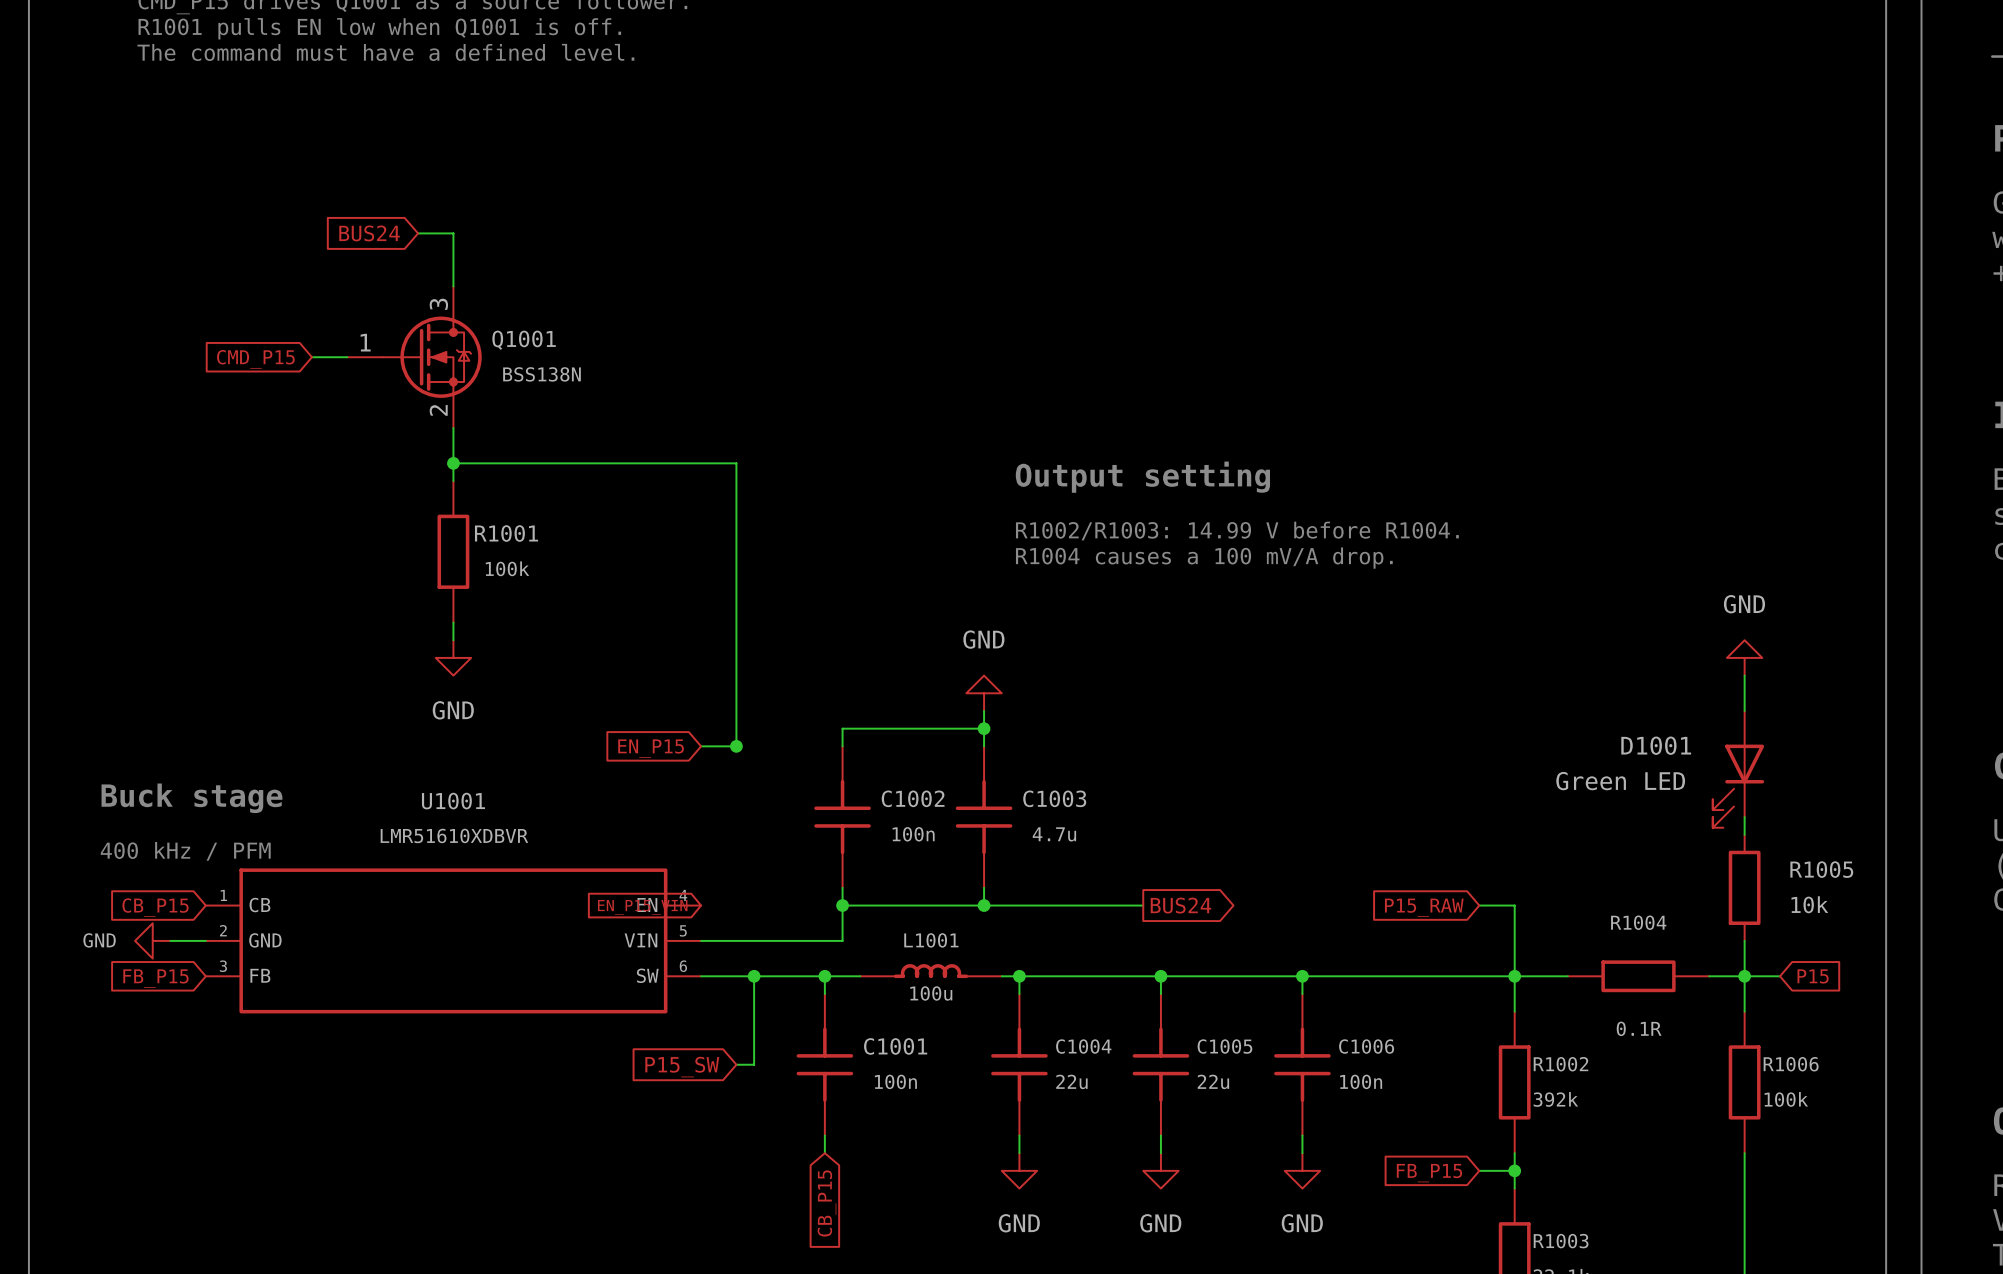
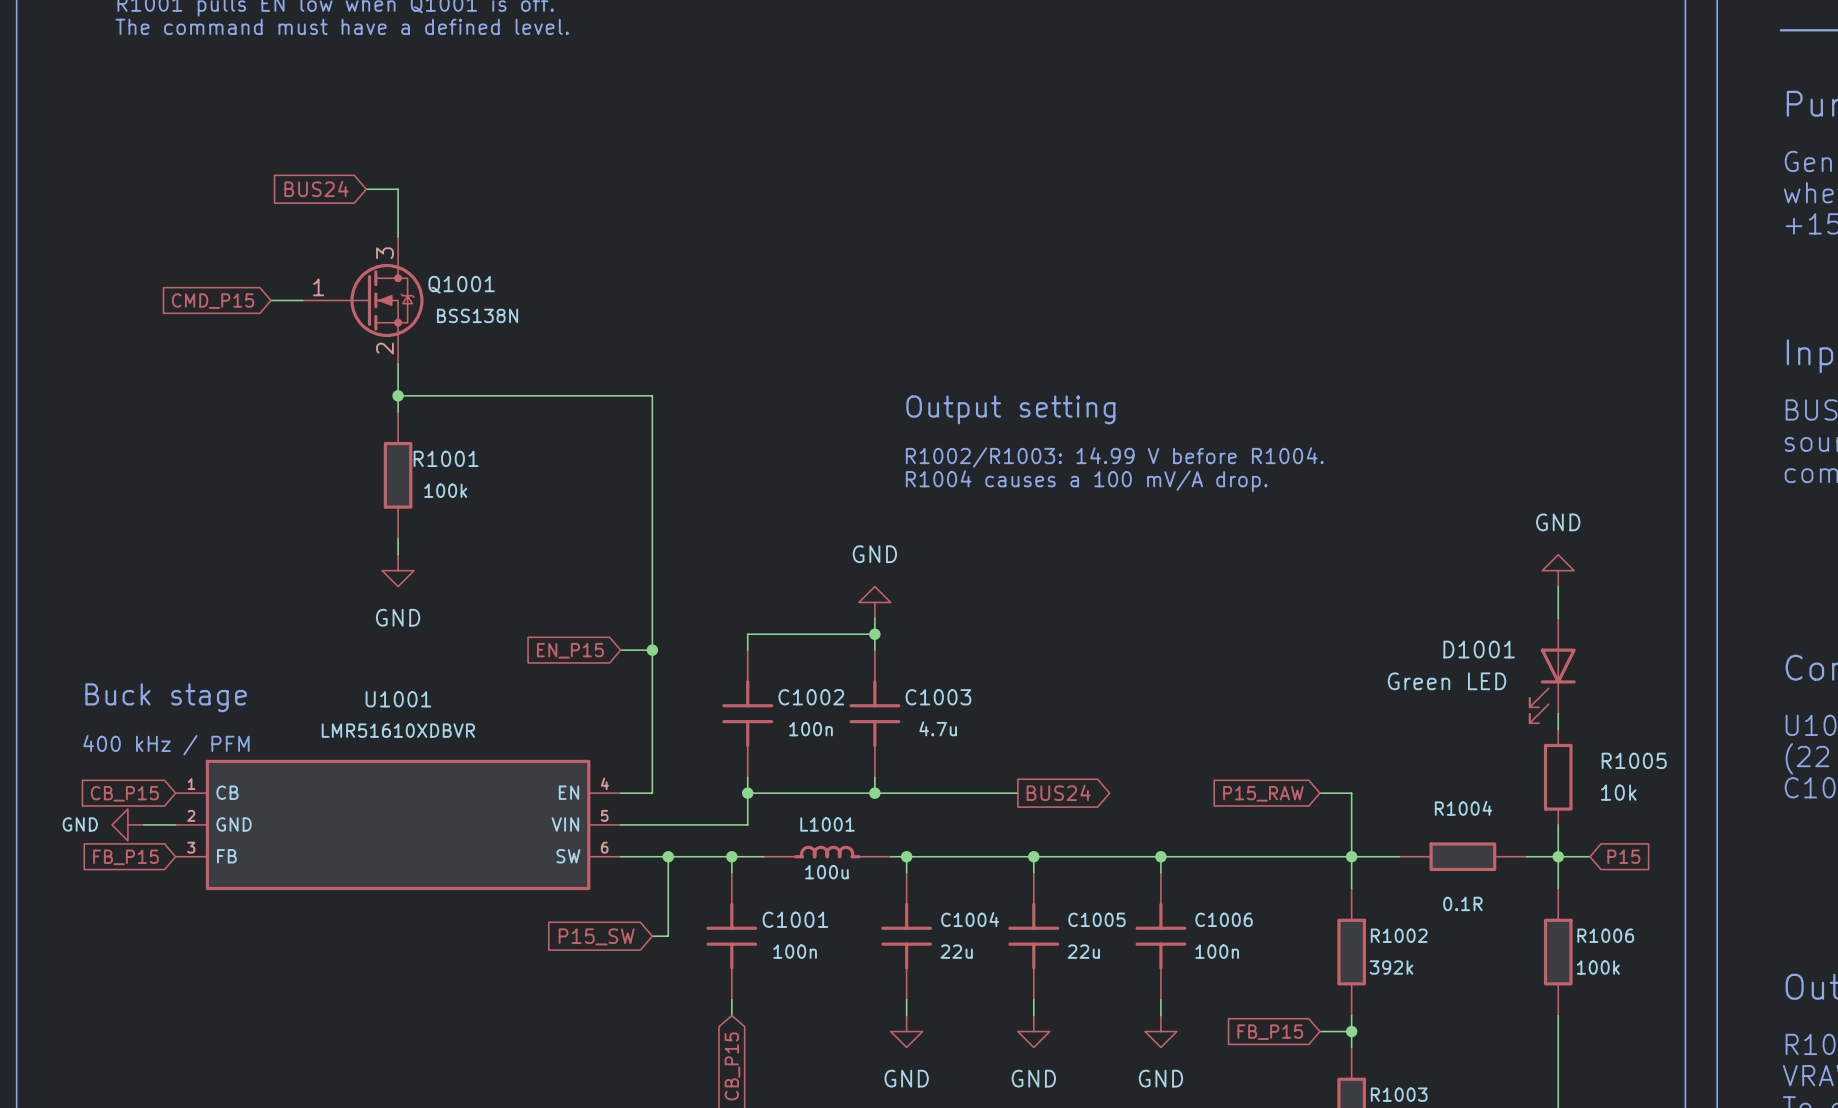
wire: none -> (652, 650) (652, 793) (620, 793)
global label: EN_P15_VIN (642, 907) -> none

